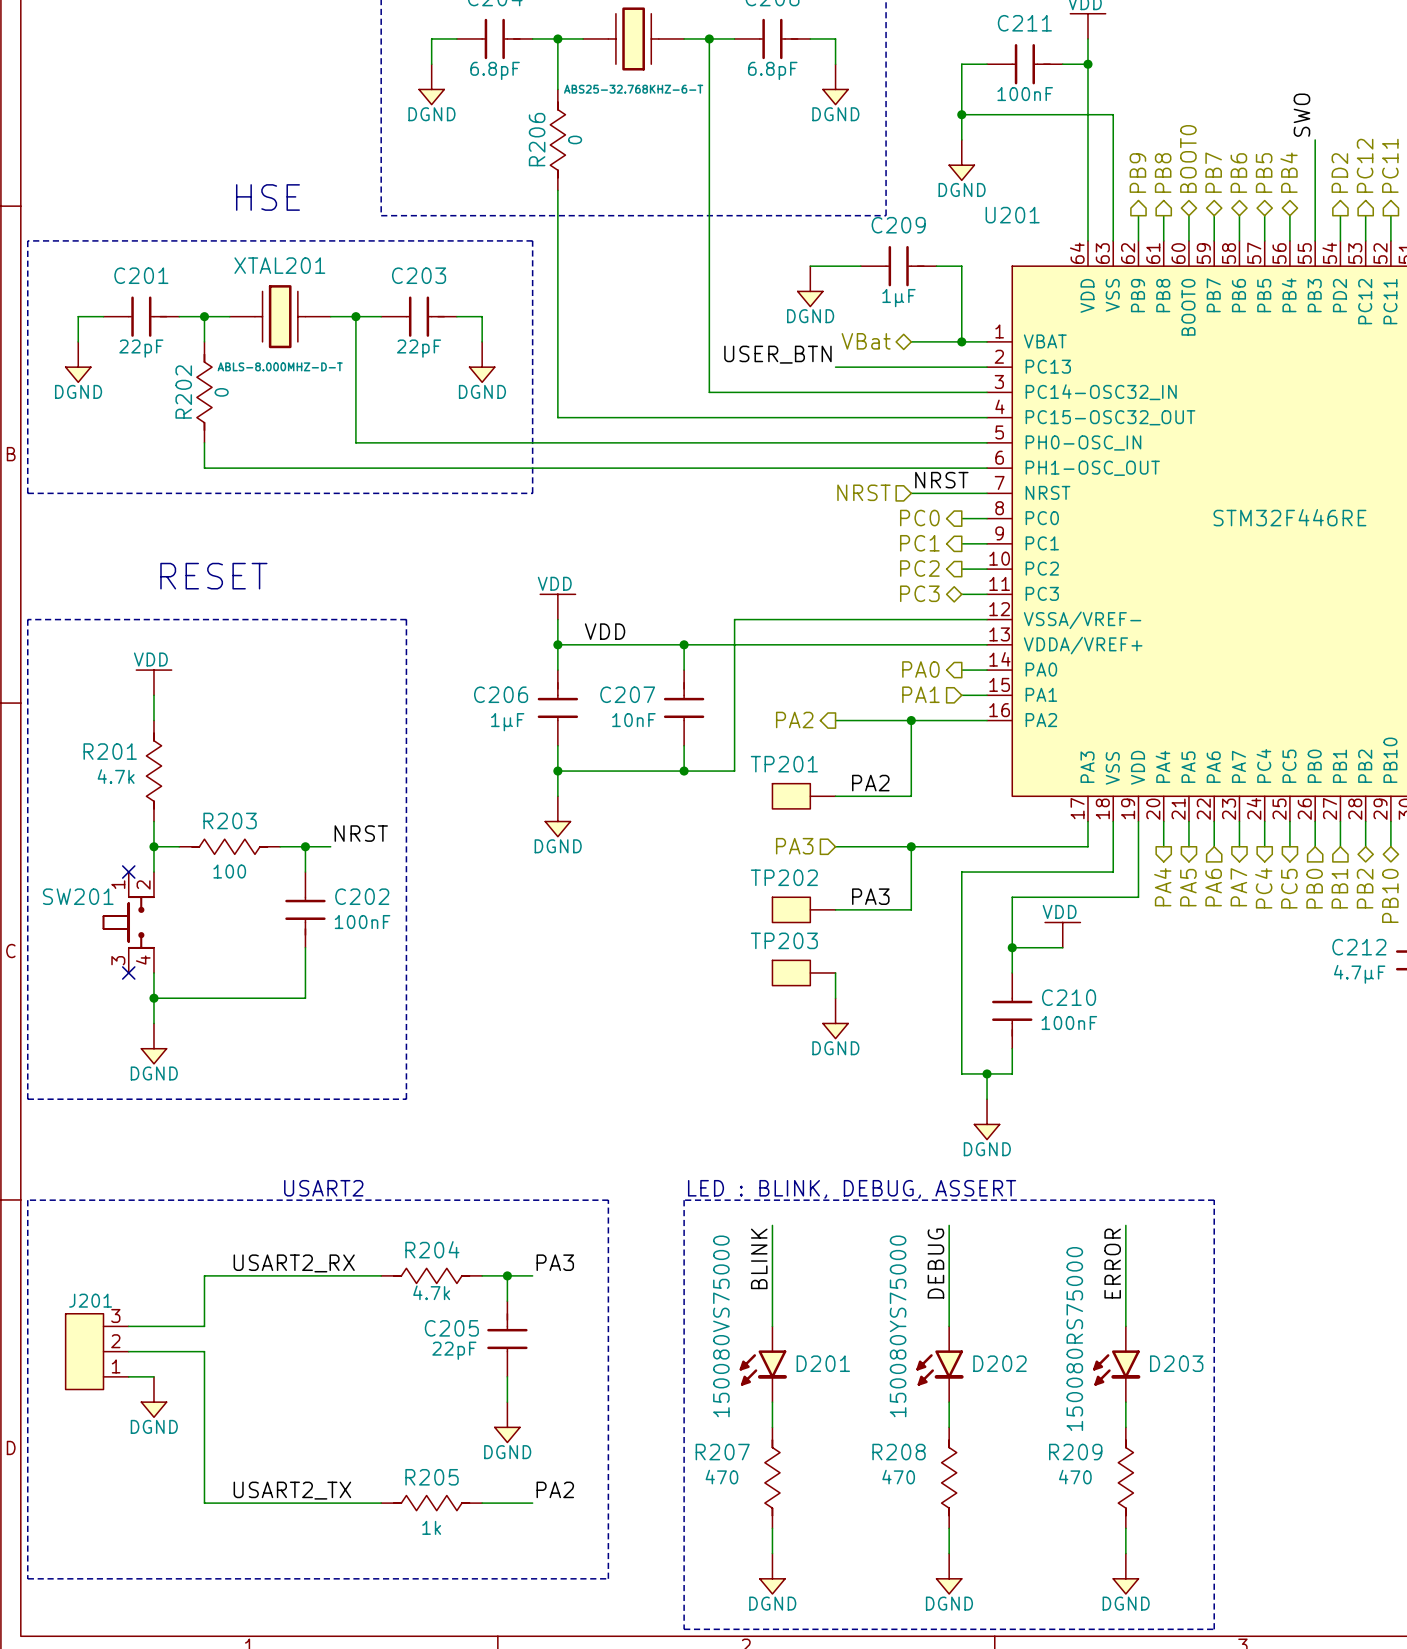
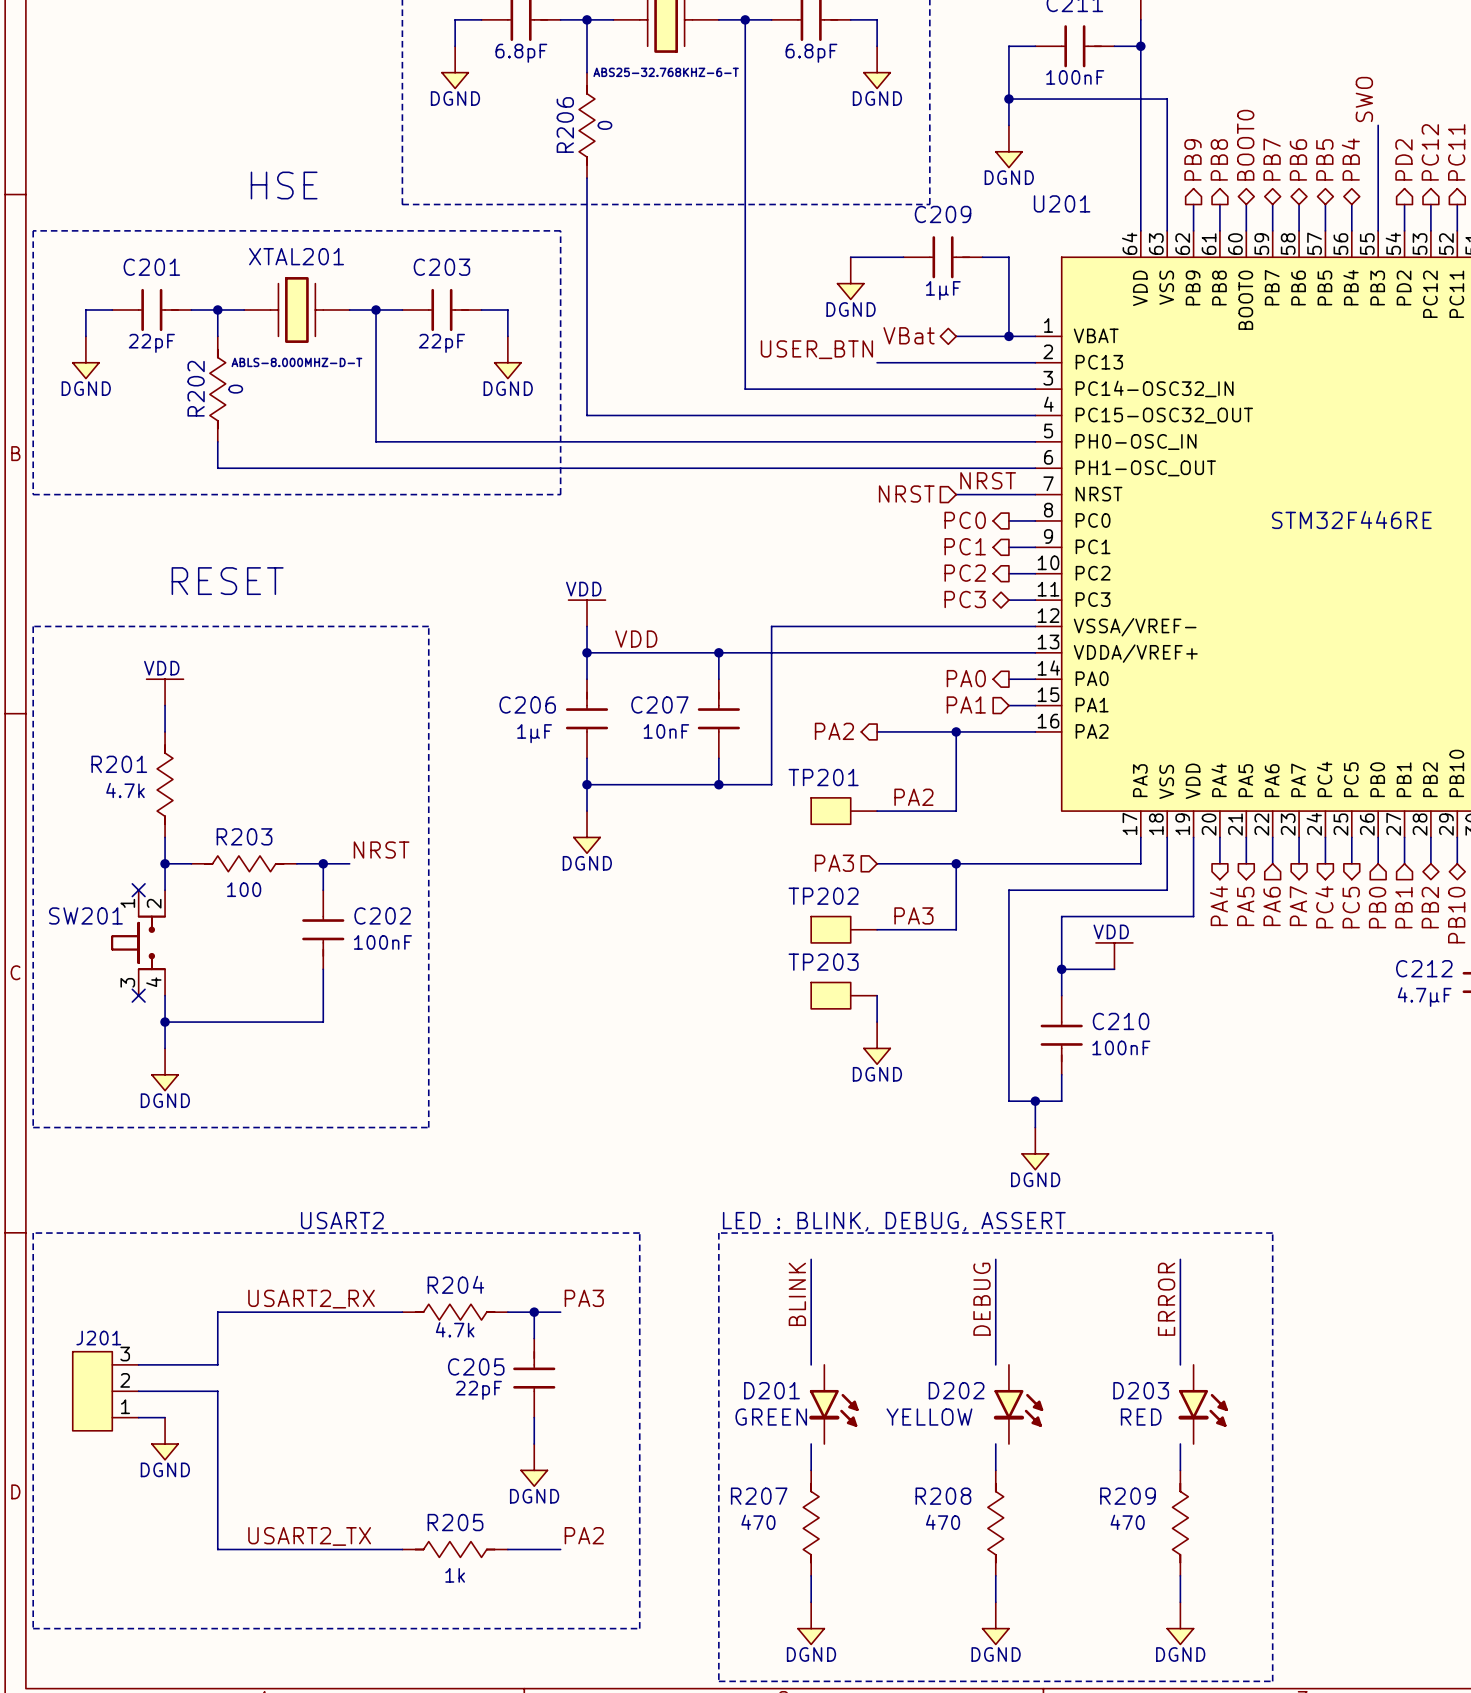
D201 value: 150080VS75000 (721, 1326) -> none
D202 value: 150080YS75000 (898, 1326) -> none
D203 value: 150080RS75000 (1074, 1339) -> none
D201 flip: as is (763, 1368) -> left-right (833, 1408)
D202 flip: as is (940, 1368) -> left-right (1018, 1408)
D203 flip: as is (1116, 1368) -> left-right (1203, 1408)
D201 text: none -> GREEN (771, 1417)
D202 text: none -> YELLOW (929, 1417)
D203 text: none -> RED (1141, 1417)

